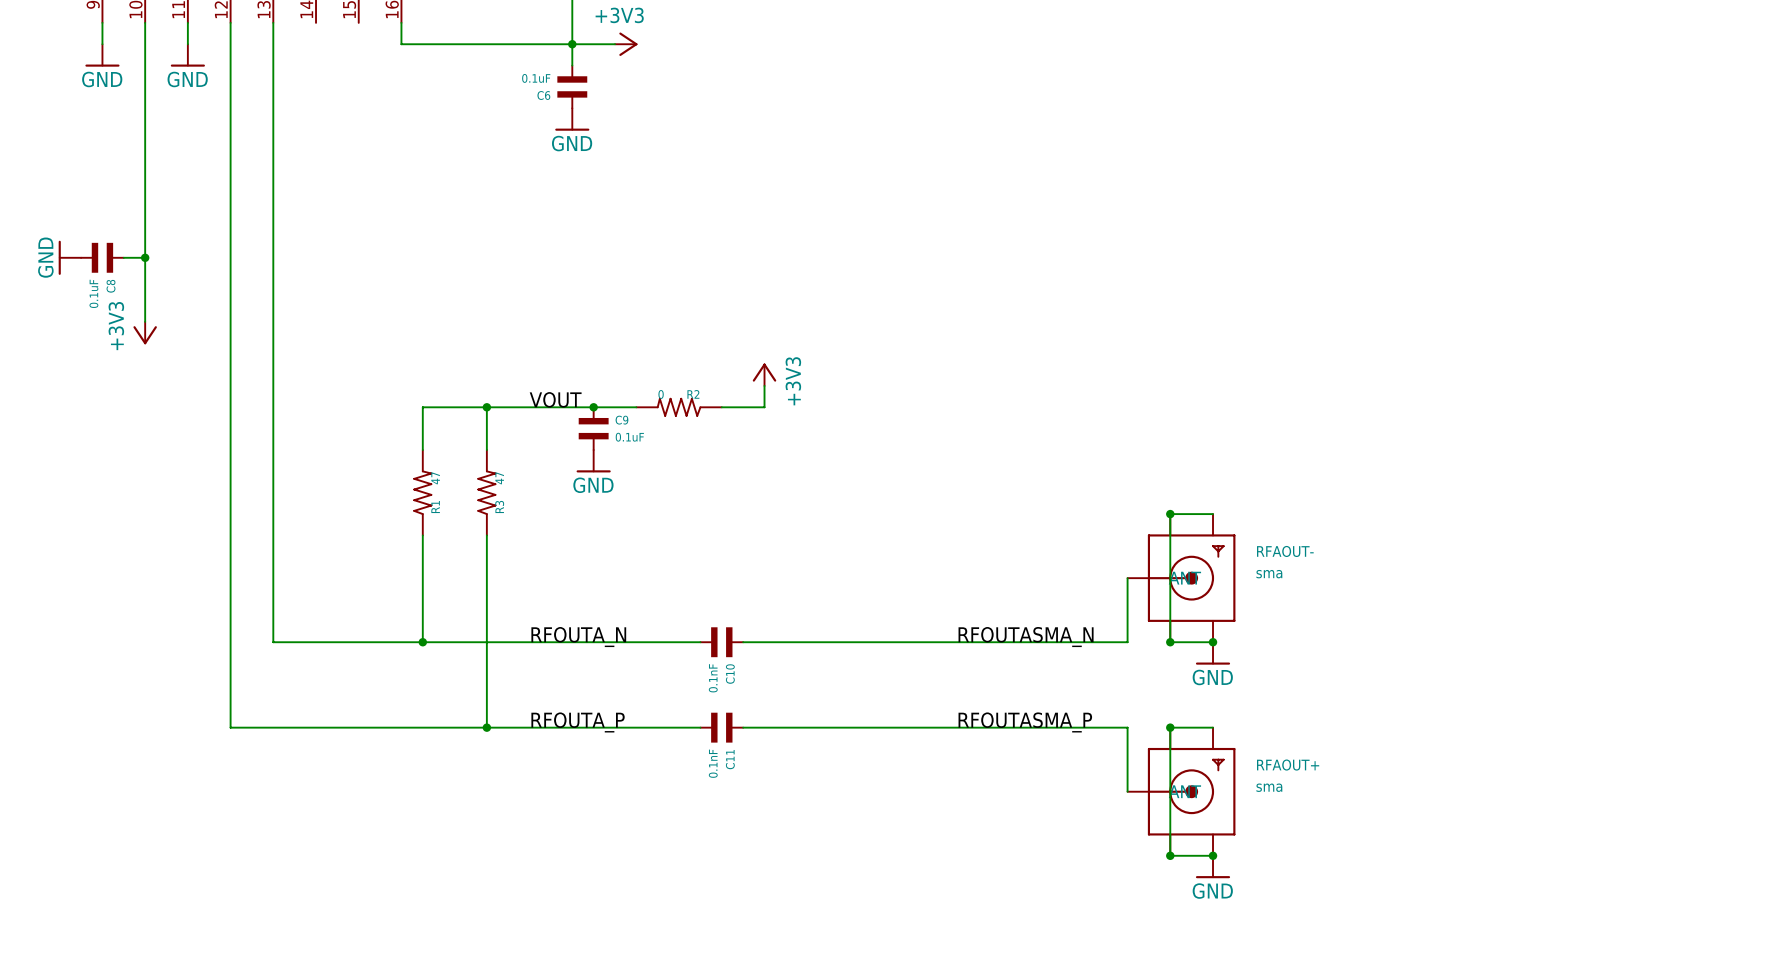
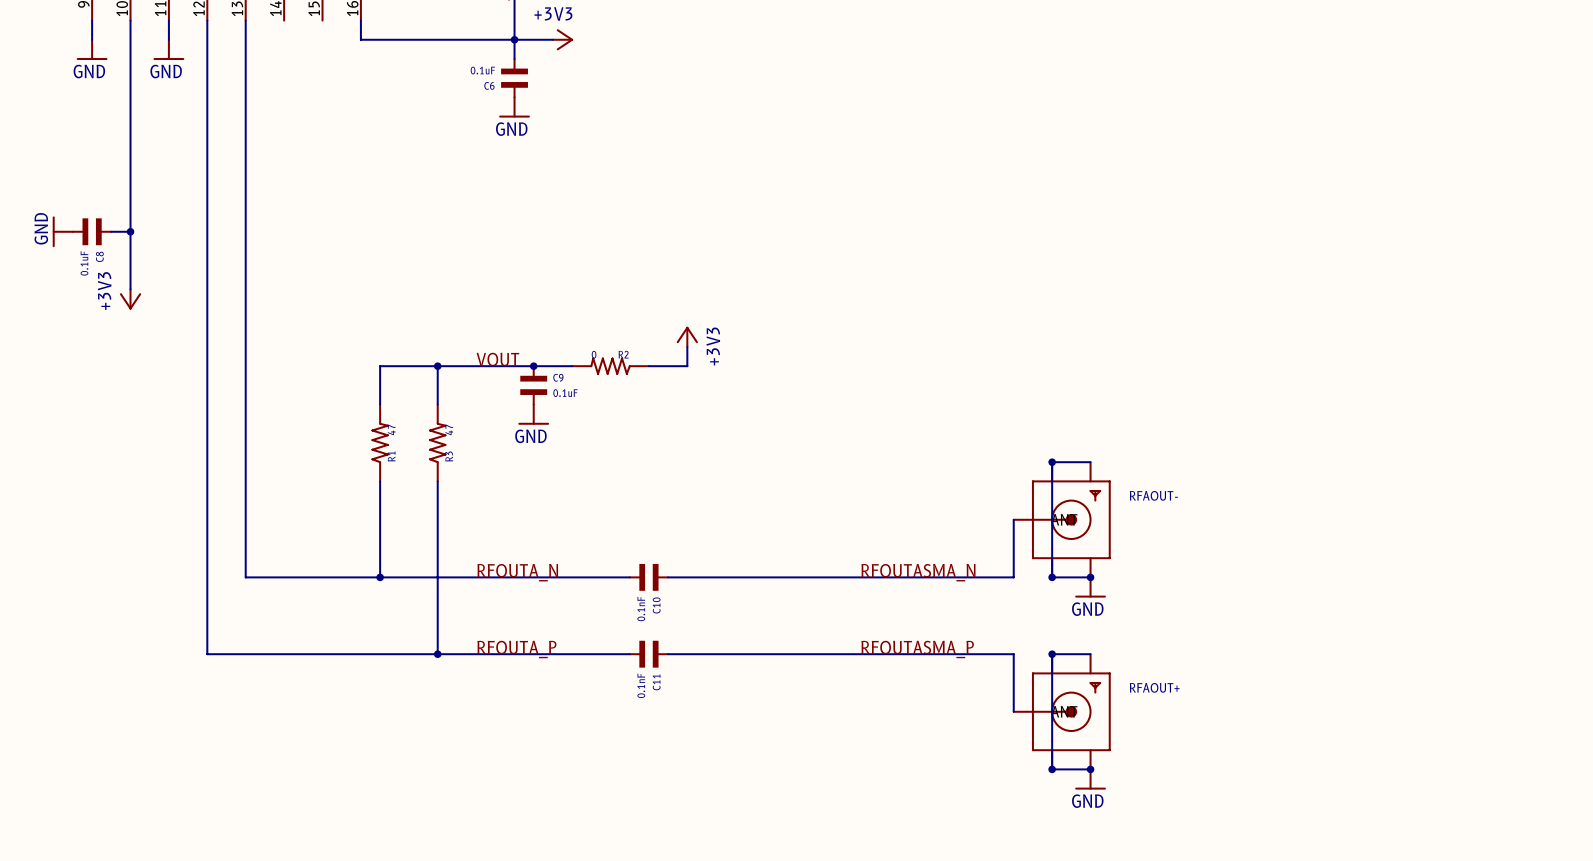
RFAOUT- value: sma (1269, 574) -> none
RFAOUT+ value: sma (1269, 787) -> none

